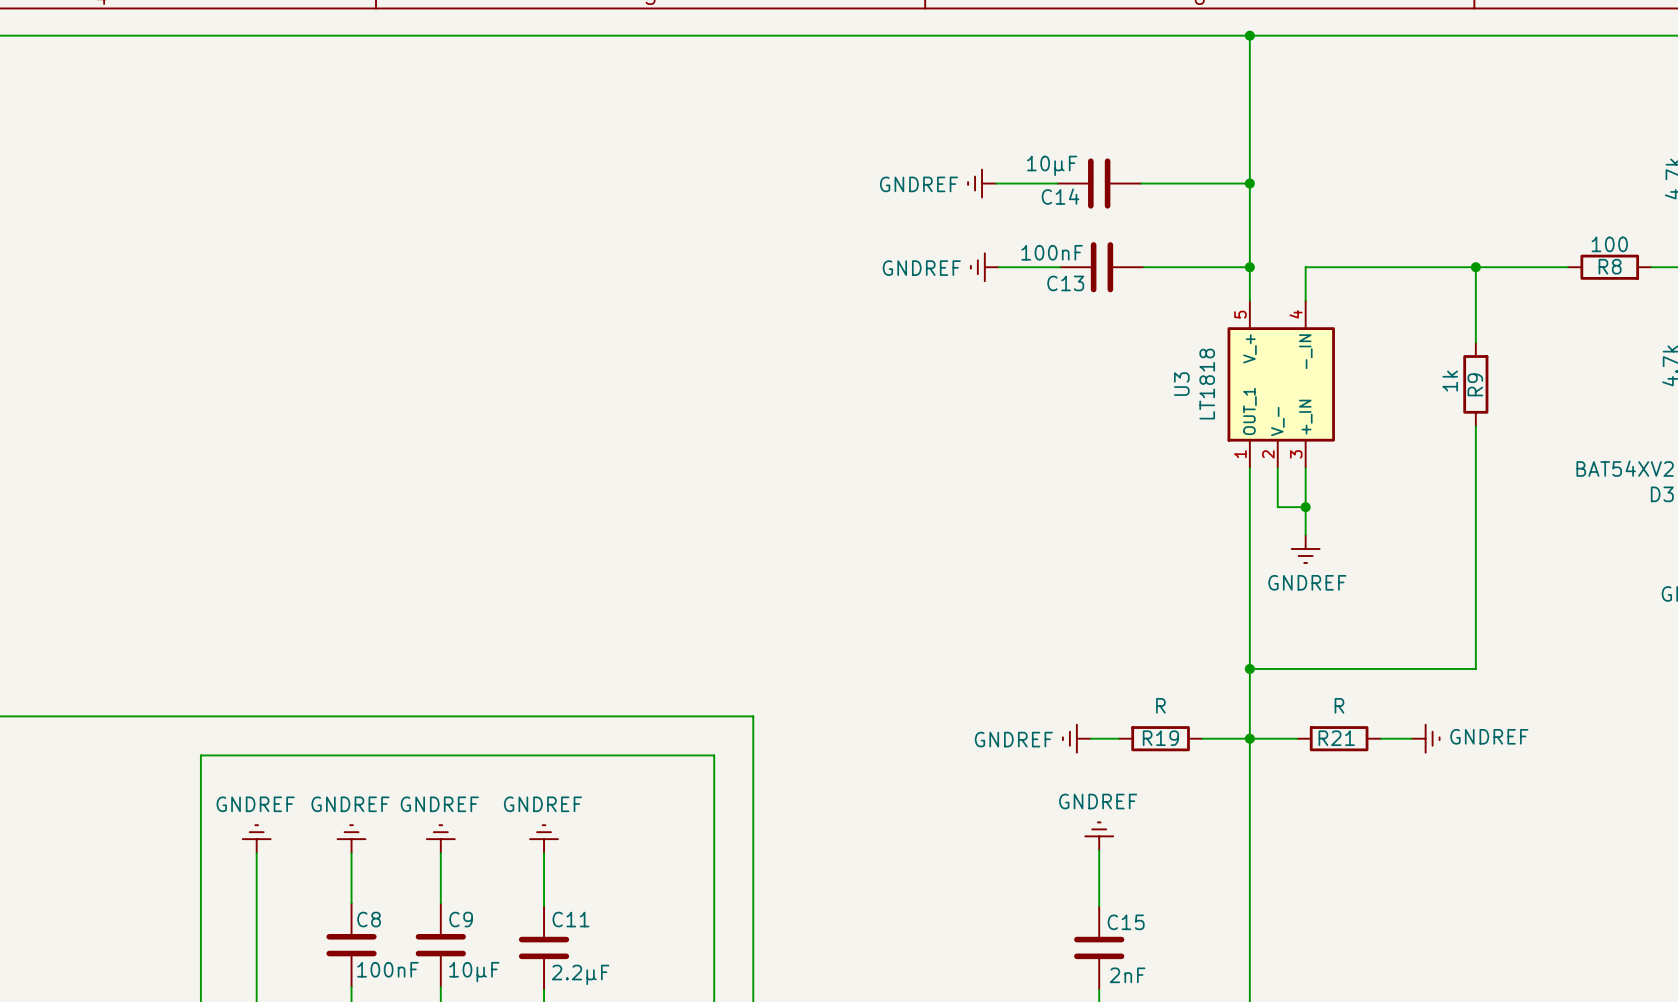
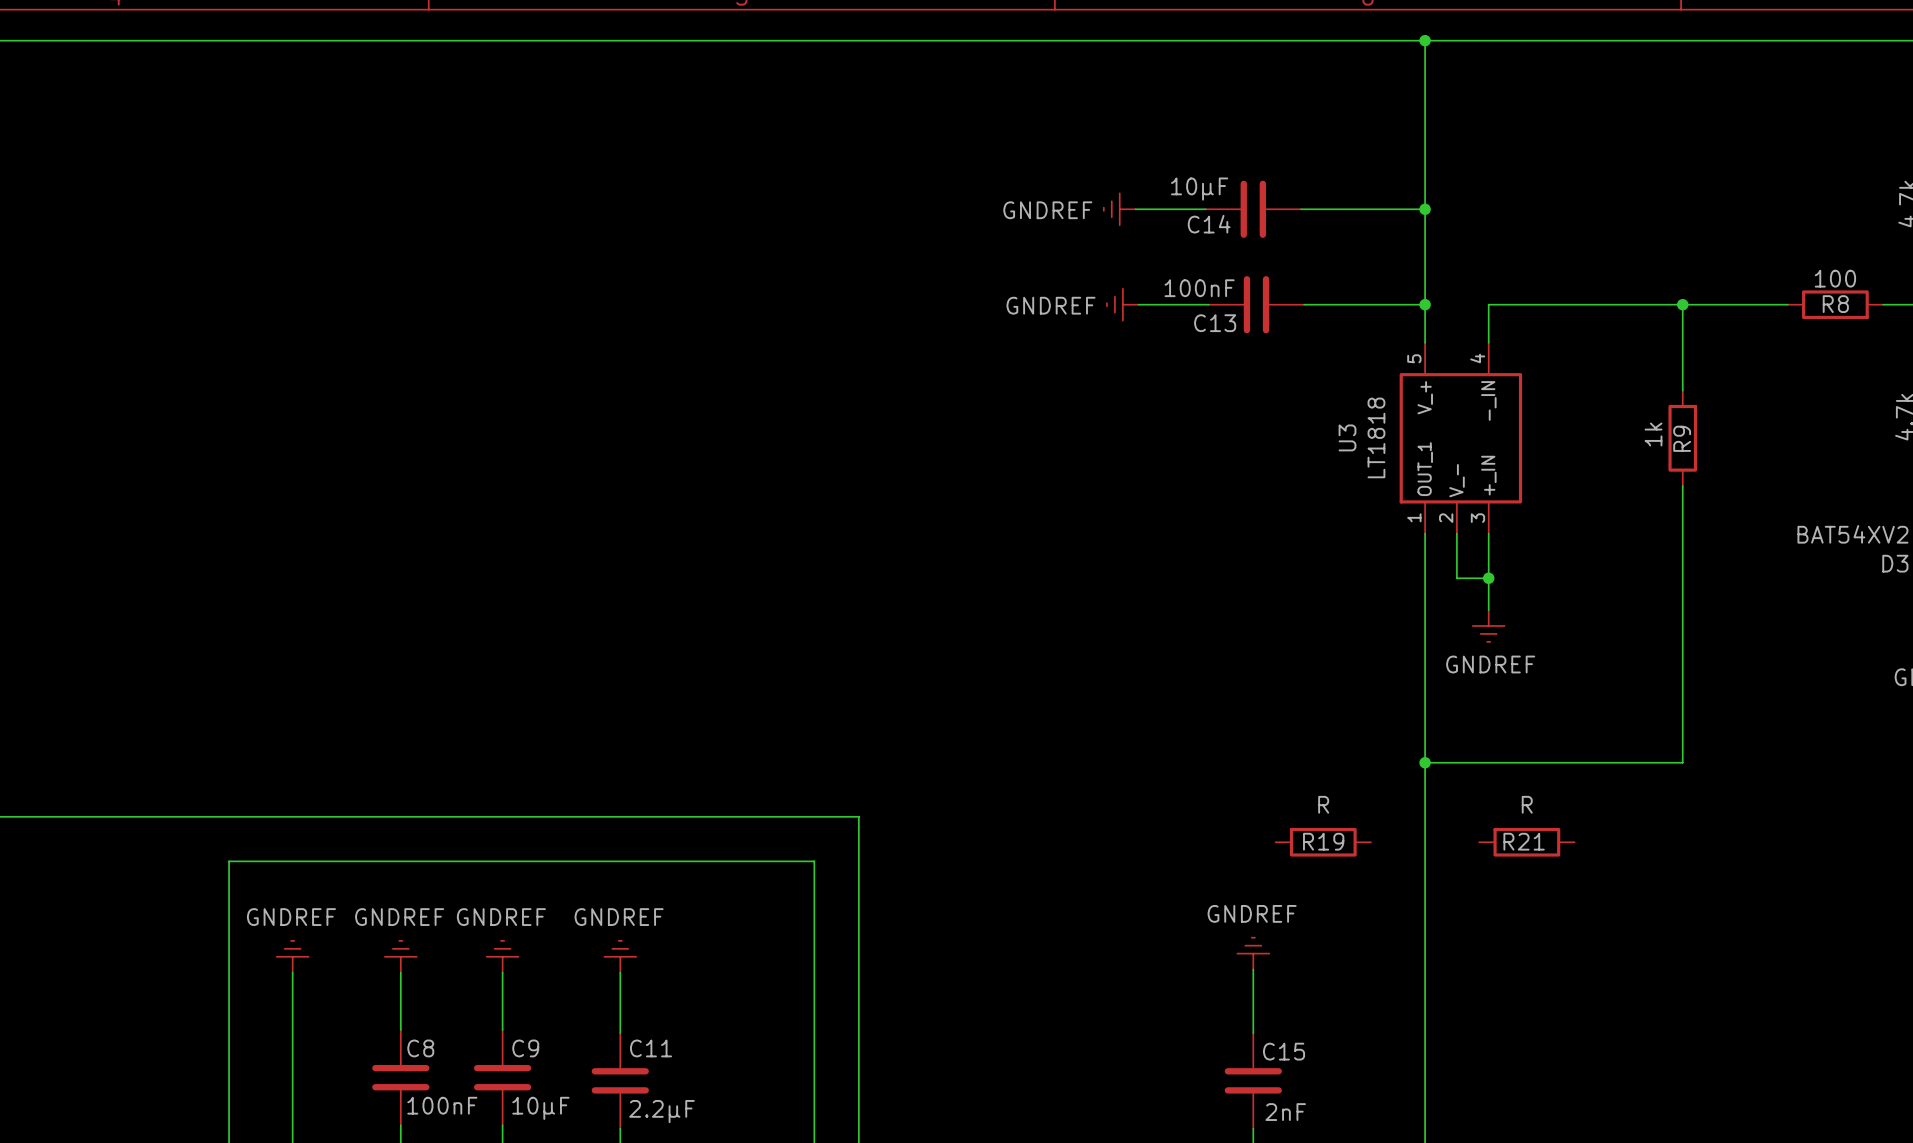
power symbol: GNDREF (1076, 738) -> none
wire: (1090, 738) (1118, 738) -> none
wire: (1202, 738) (1297, 738) -> none
junction: (1249, 738) -> none
wire: (1380, 738) (1411, 738) -> none
power symbol: GNDREF (1425, 738) -> none

